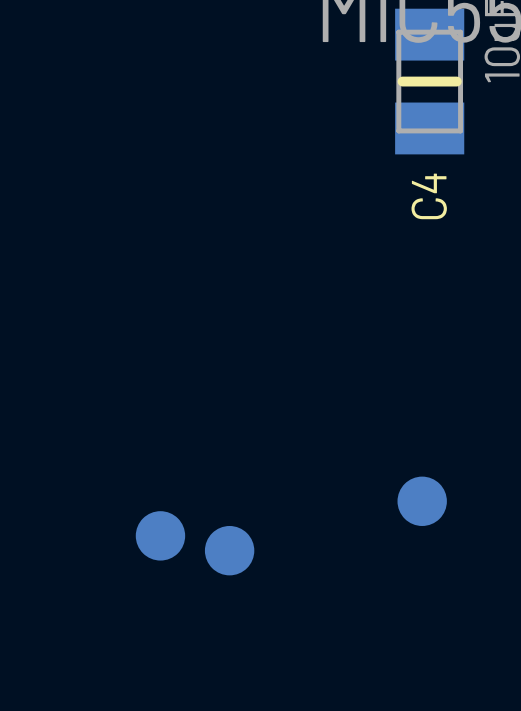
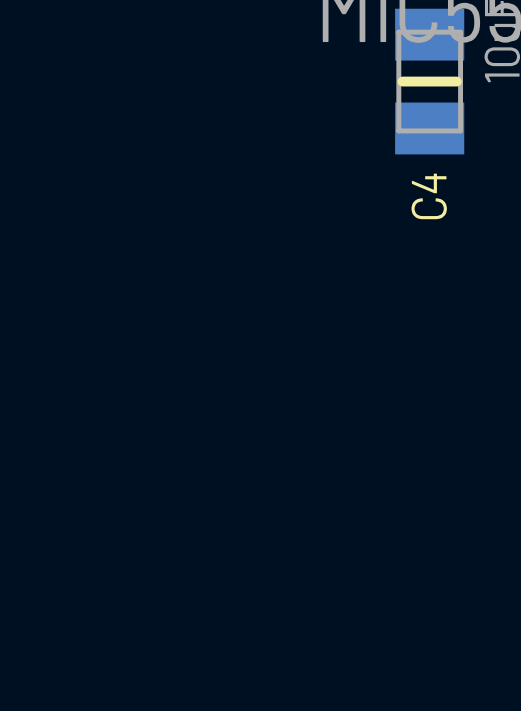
part: (422, 501) -> none
part: (160, 535) -> none
part: (229, 550) -> none

